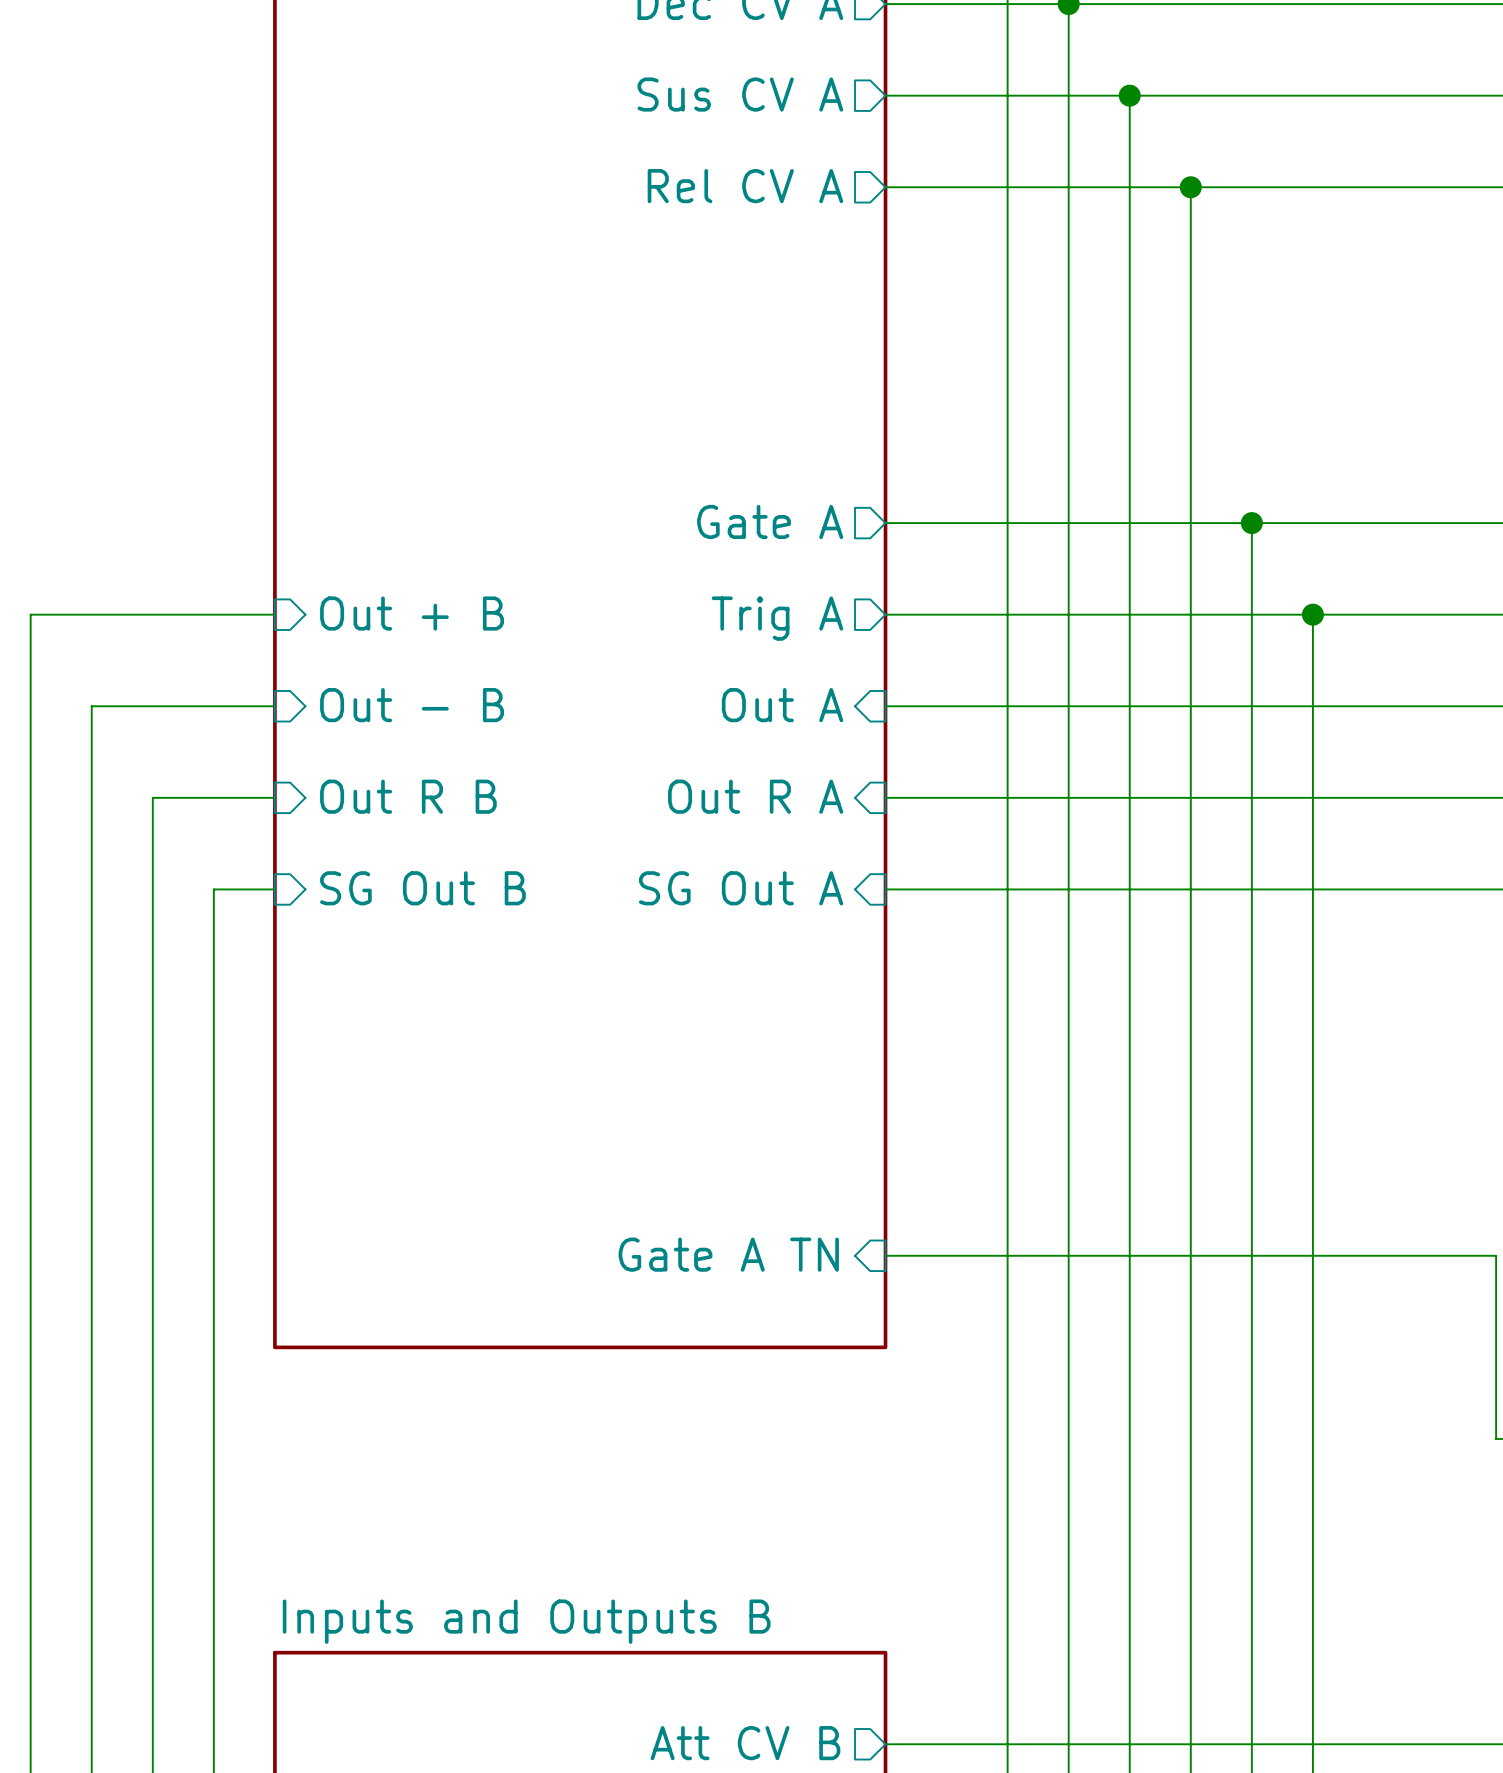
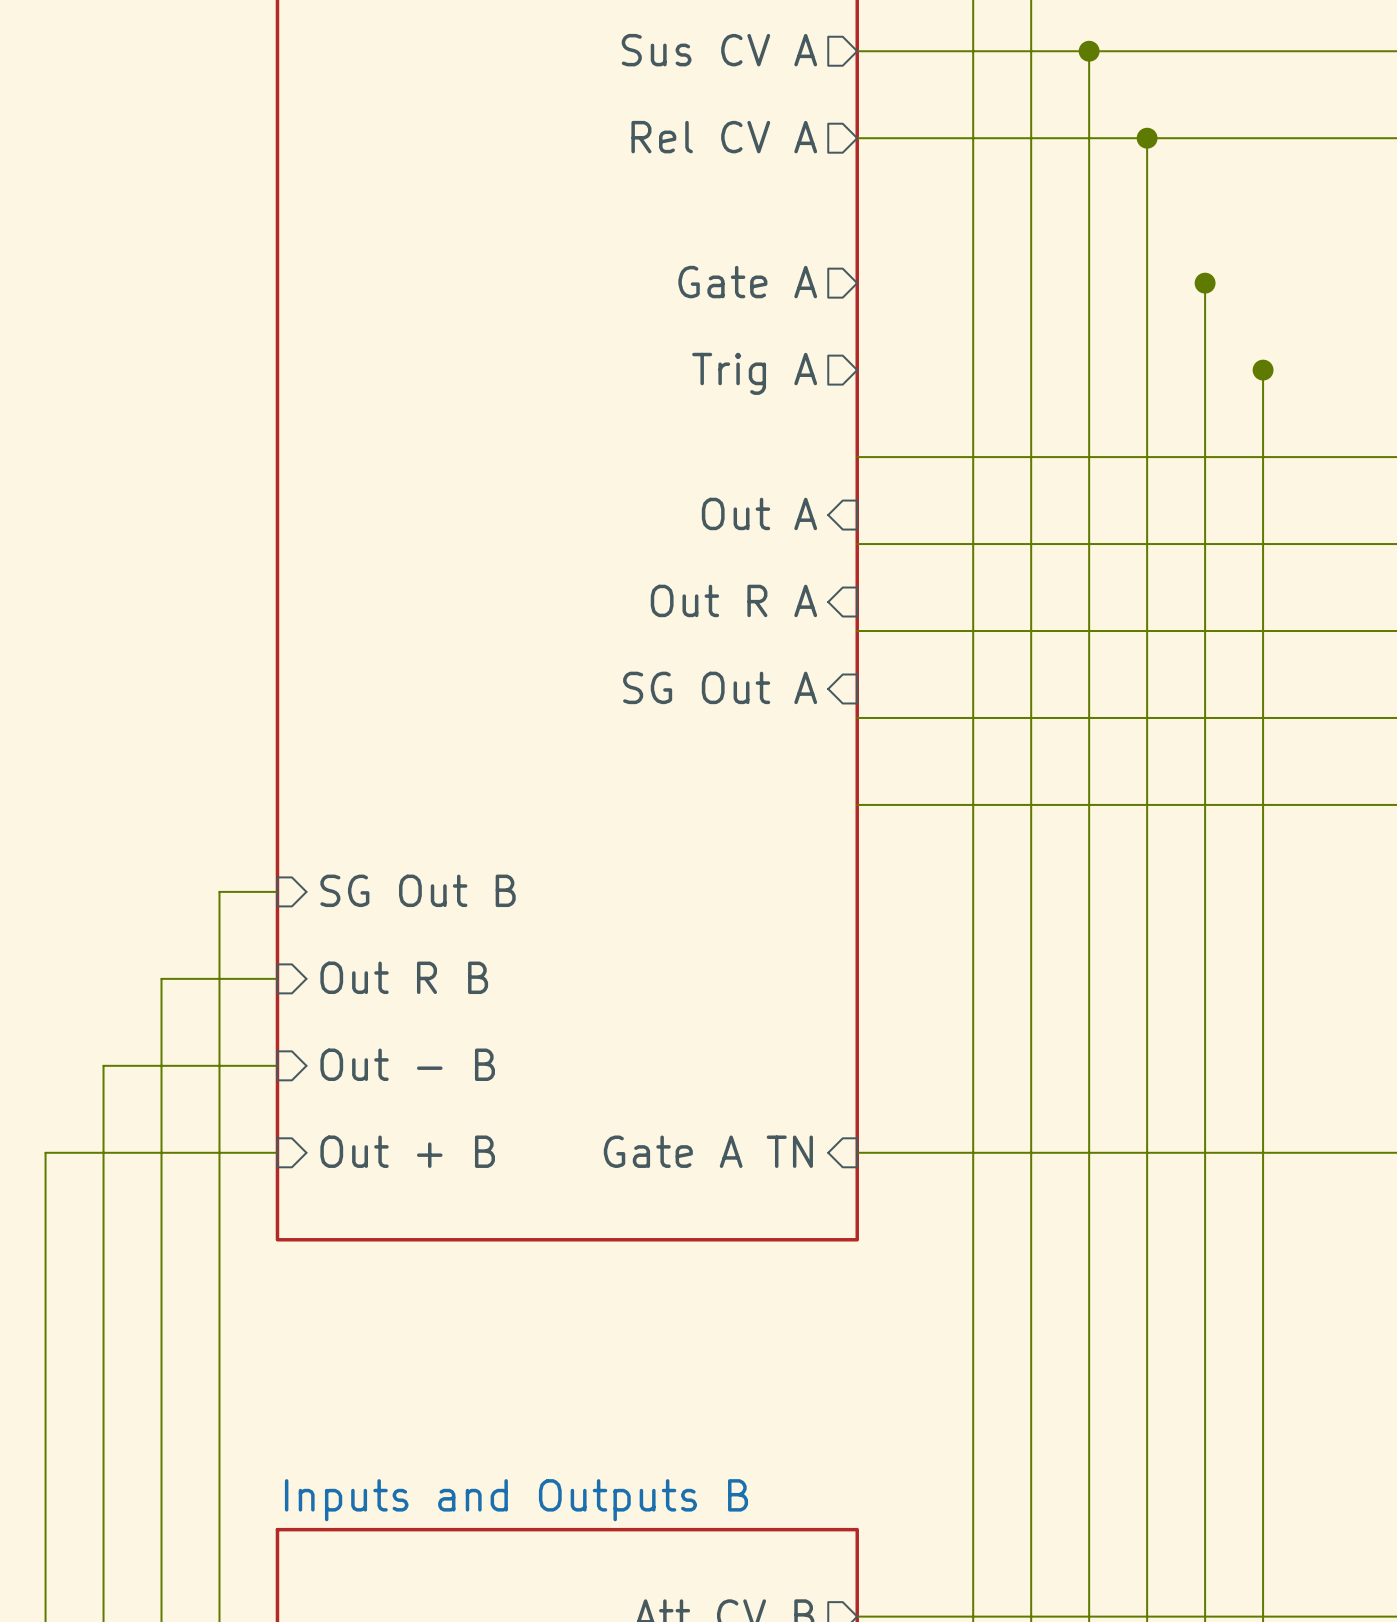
wire: none -> (1205, 283) (1205, 457)
junction: none -> (1205, 283)
wire: none -> (1263, 370) (1263, 544)
junction: none -> (1263, 370)
sheet pin position: Gate A (770, 521) -> Gate A (747, 282)
junction: (1251, 523) -> none
sheet pin: Out + B (412, 613) -> none
wire: (274, 614) (30, 614) (30, 1255) -> (277, 1152) (45, 1152)
junction: (1312, 614) -> none
sheet pin position: Trig A (777, 618) -> Trig A (754, 373)
sheet pin position: Out - B (412, 705) -> Out - B (407, 1064)
sheet pin position: Out A (782, 705) -> Out A (759, 513)
wire: (274, 706) (91, 706) (91, 1164) -> (277, 1065) (103, 1065)
sheet pin position: Out R B (408, 796) -> Out R B (404, 977)
sheet pin position: Out R A (755, 796) -> Out R A (733, 600)
wire: (274, 797) (152, 797) (152, 1072) -> (277, 978) (161, 978)
sheet pin position: SG Out B (422, 888) -> SG Out B (418, 890)
sheet pin position: SG Out A (741, 888) -> SG Out A (720, 687)
wire: (274, 889) (213, 889) (213, 981) -> (277, 891) (219, 891)
sheet pin: none -> Out + B (407, 1151)

